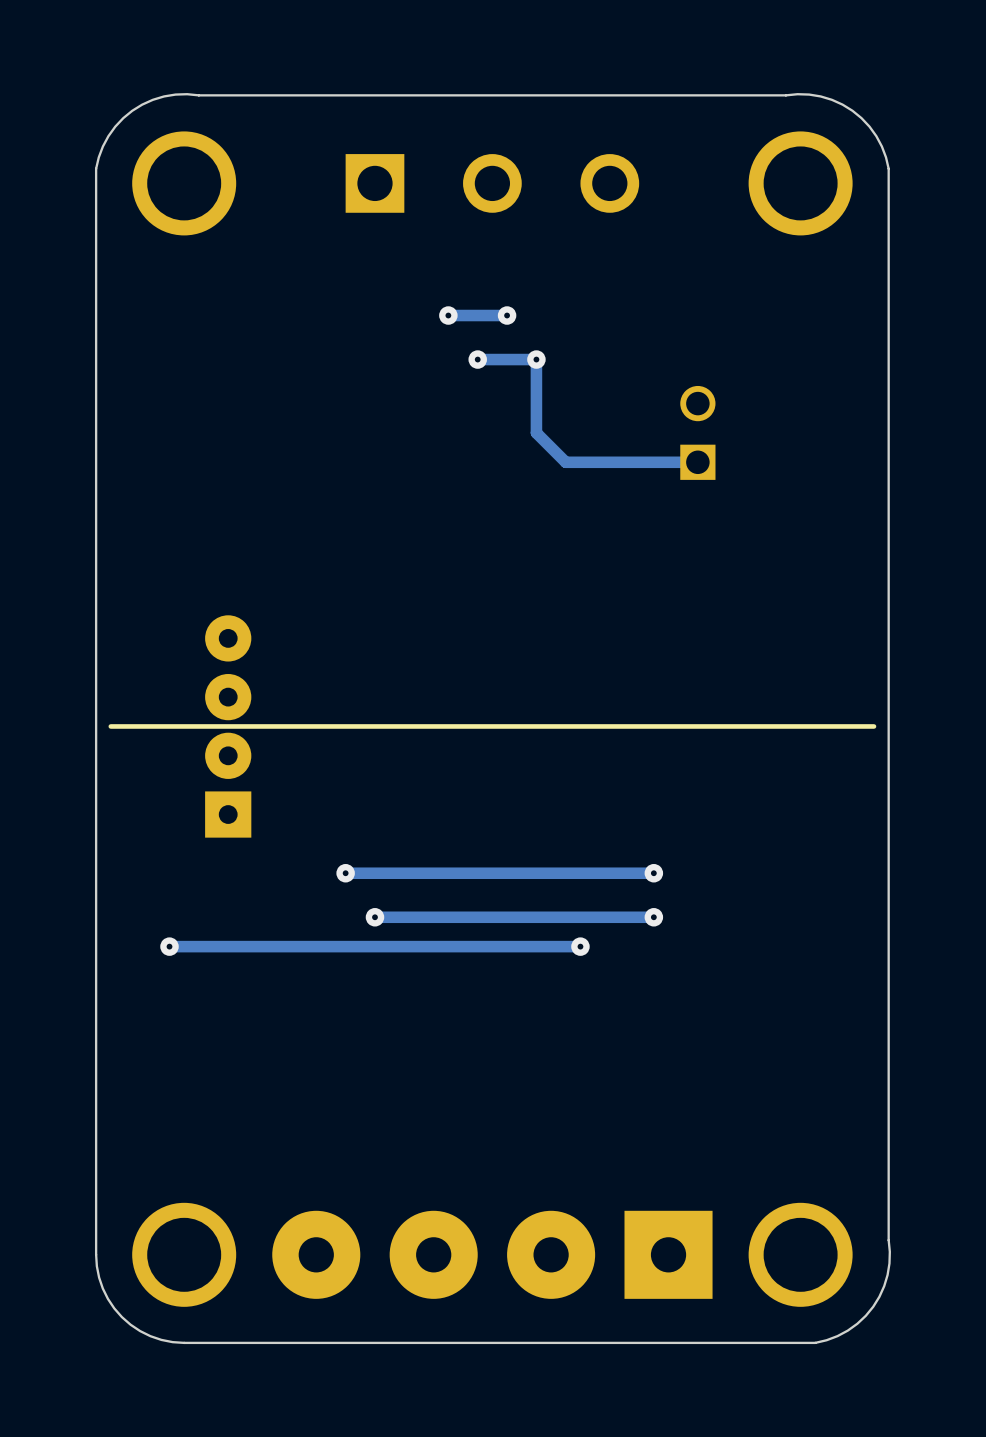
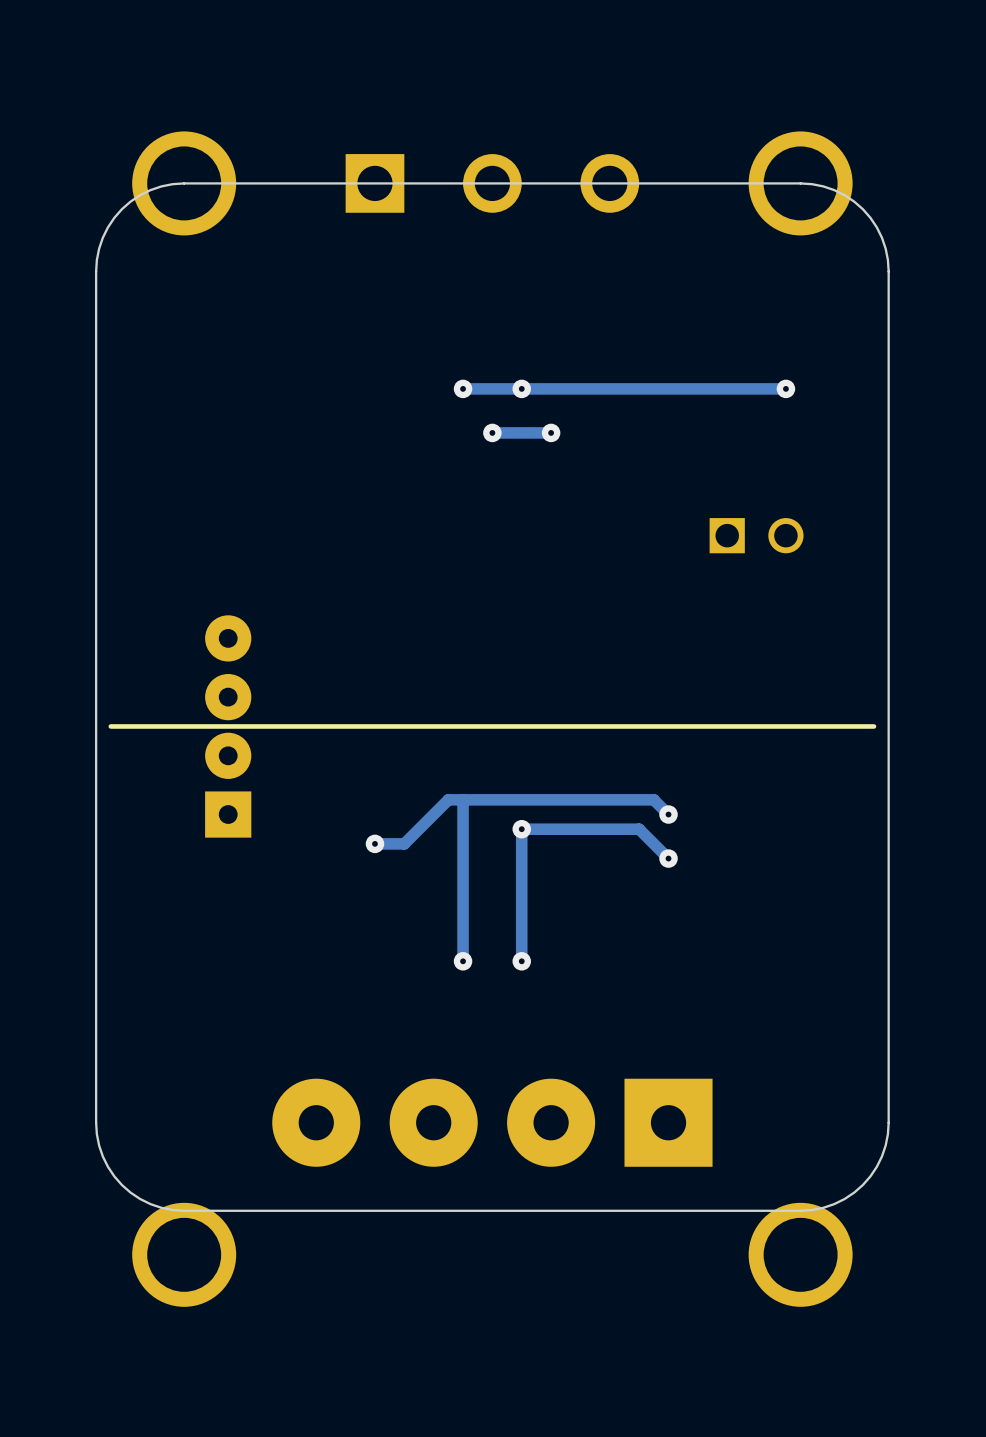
board edge: (96, 168) (96, 271) -> (888, 1122) (888, 271) (887, 259) (881, 237) (870, 217) (862, 209) (854, 201) (834, 190) (823, 186) (800, 183) (172, 184) (150, 190) (140, 195) (121, 209) (114, 217) (107, 227) (99, 248) (96, 271)
board edge: (96, 168) (102, 146) (115, 126) (123, 118) (142, 104) (164, 96) (175, 94) (809, 94) (820, 96) (842, 104) (861, 118) (869, 126) (881, 146) (888, 168) (888, 1240) -> none
via: (448, 315) -> none
track: (507, 315) (448, 315) -> (551, 432) (492, 432)
via: (507, 315) -> none
track: (477, 359) (536, 359) (536, 432) (565, 462) (697, 462) -> none
via: (477, 359) -> none
via: (536, 359) -> none
via: none -> (463, 388)
via: none -> (521, 388)
track: none -> (785, 388) (463, 388)
via: none -> (785, 388)
via: none -> (492, 432)
via: none -> (551, 432)
part rotation: 0° (697, 432) -> 90° clockwise (756, 535)
part position: (697, 432) -> (756, 535)
track: none -> (463, 799) (463, 961)
track: none -> (668, 814) (653, 799) (448, 799) (404, 843) (374, 843)
via: none -> (668, 814)
via: none -> (521, 829)
via: none -> (374, 843)
track: none -> (668, 858) (639, 829) (521, 829) (521, 961)
via: (345, 873) -> none
track: (653, 873) (345, 873) -> none
via position: (653, 873) -> (668, 858)
via: (374, 917) -> none
track: (653, 917) (374, 917) -> none
via: (653, 917) -> none
via: (169, 946) -> none
track: (580, 946) (169, 946) -> none
via: (580, 946) -> none
via: none -> (463, 961)
via: none -> (521, 961)
board edge: (96, 1122) (96, 1254) (99, 1277) (102, 1288) (114, 1308) (130, 1324) (150, 1336) (172, 1342) (815, 1342) (826, 1340) (847, 1330) (865, 1315) (873, 1306) (884, 1286) (887, 1274) (889, 1263) (888, 1240) -> (96, 1122) (99, 1145) (102, 1156) (114, 1176) (121, 1185) (140, 1199) (150, 1204) (172, 1210) (184, 1210) (812, 1210) (834, 1204) (844, 1199) (862, 1185) (876, 1166) (881, 1156) (885, 1145) (888, 1122)
part position: (492, 1254) -> (492, 1122)

